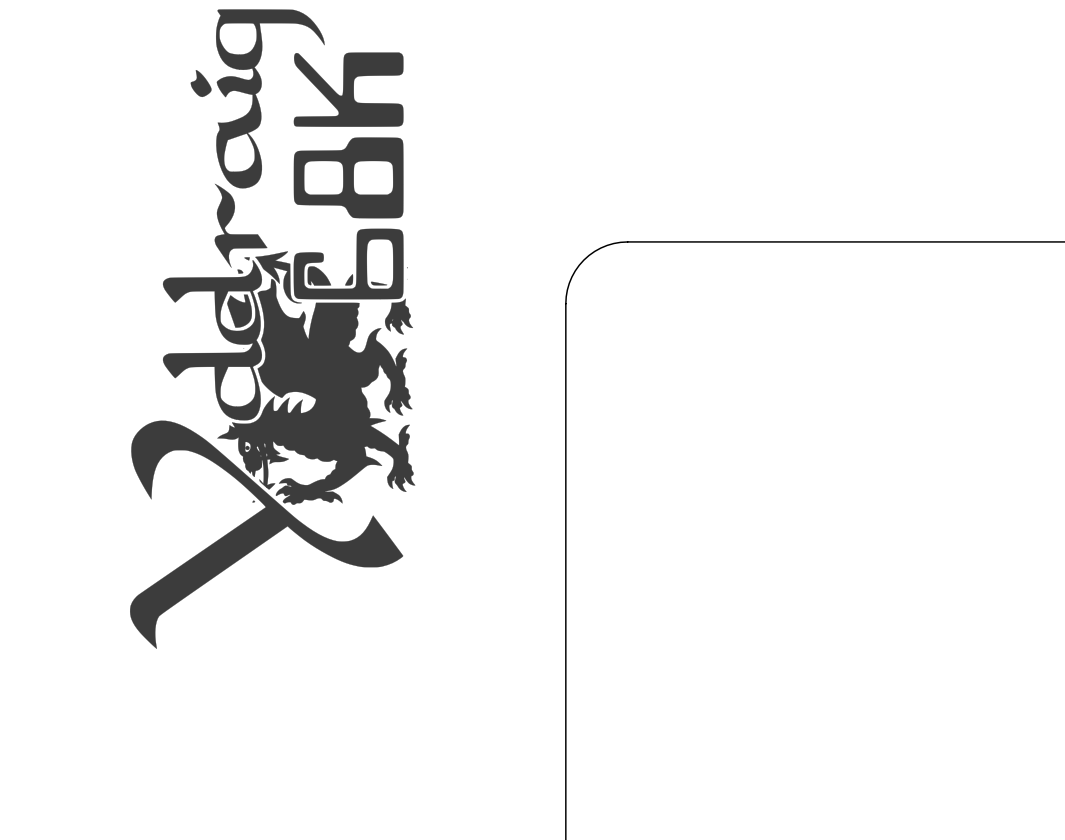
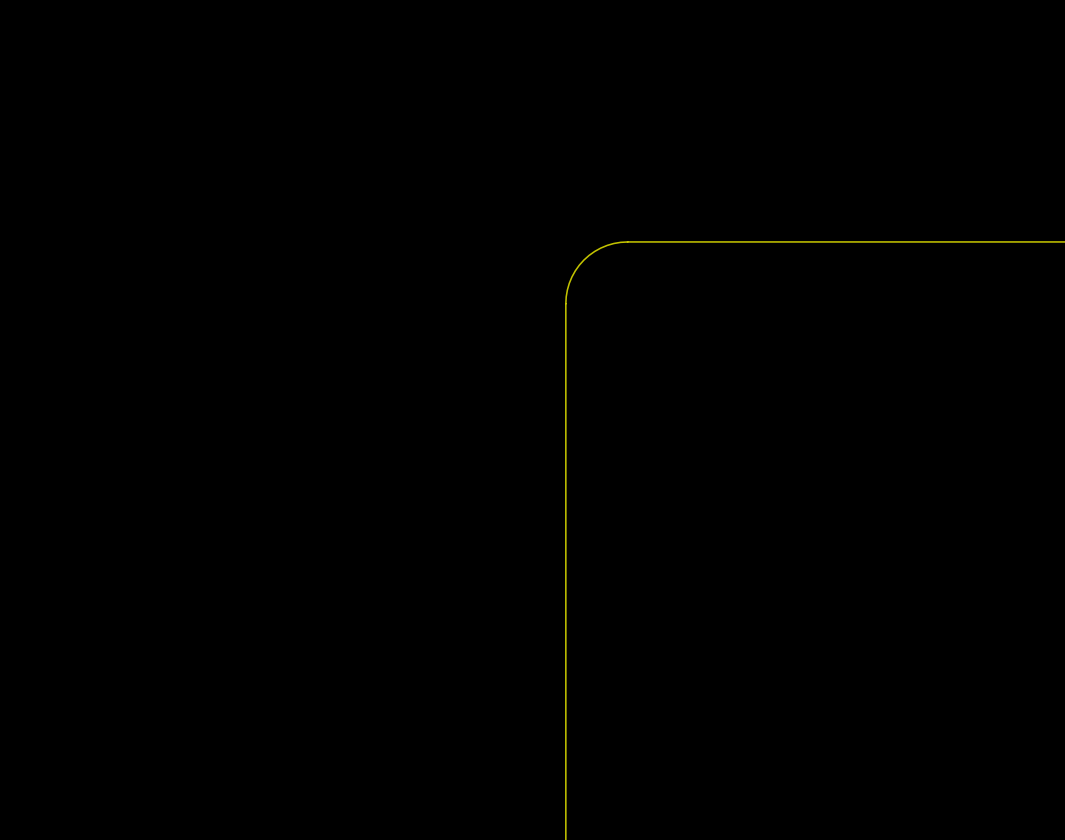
drawing: [129, 9, 416, 649] -> none

